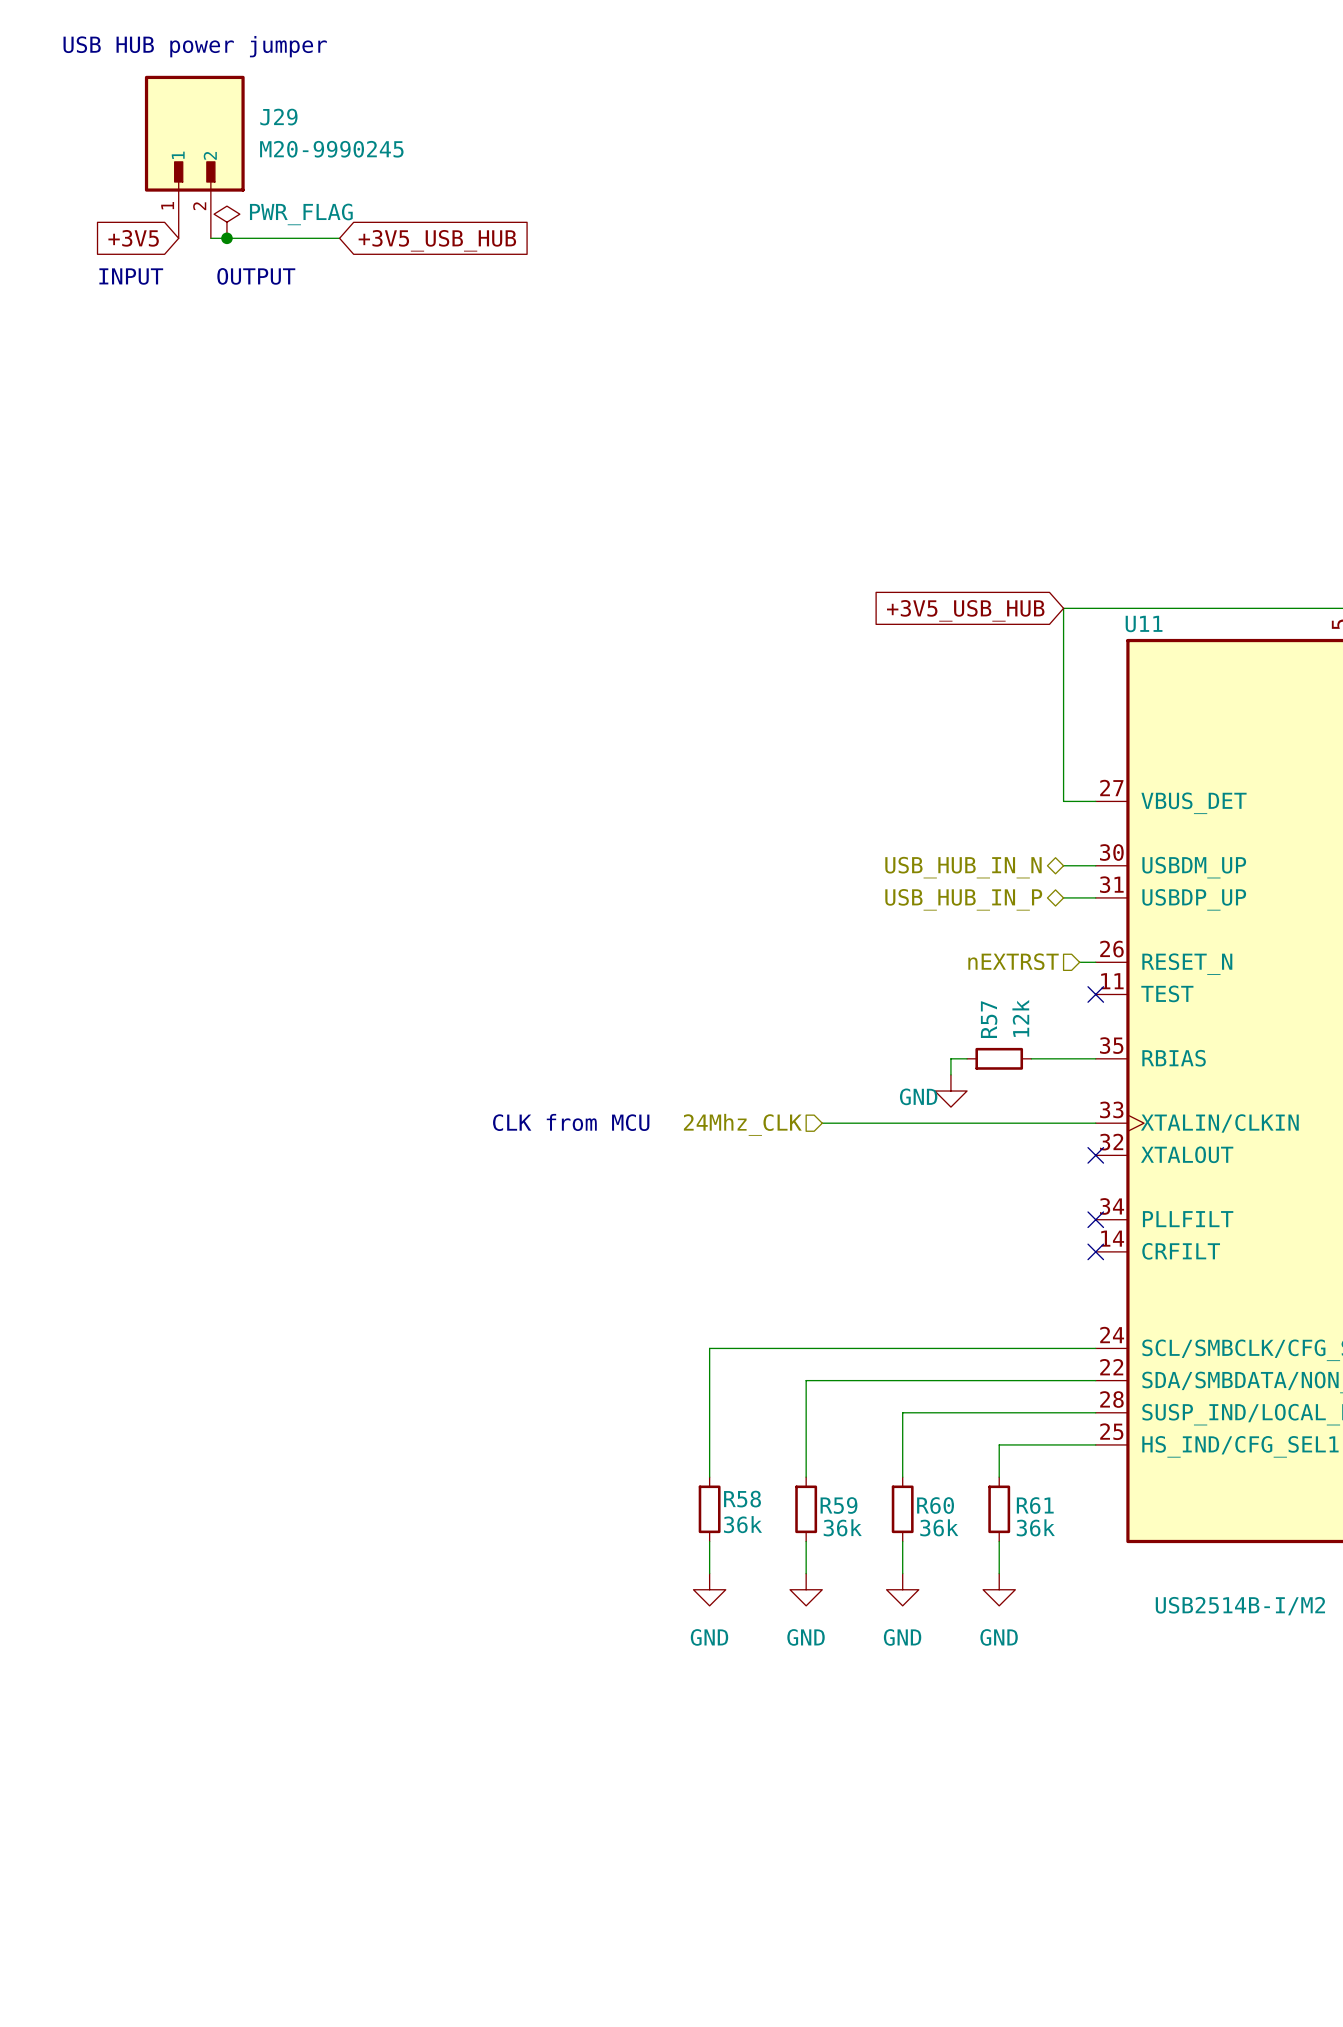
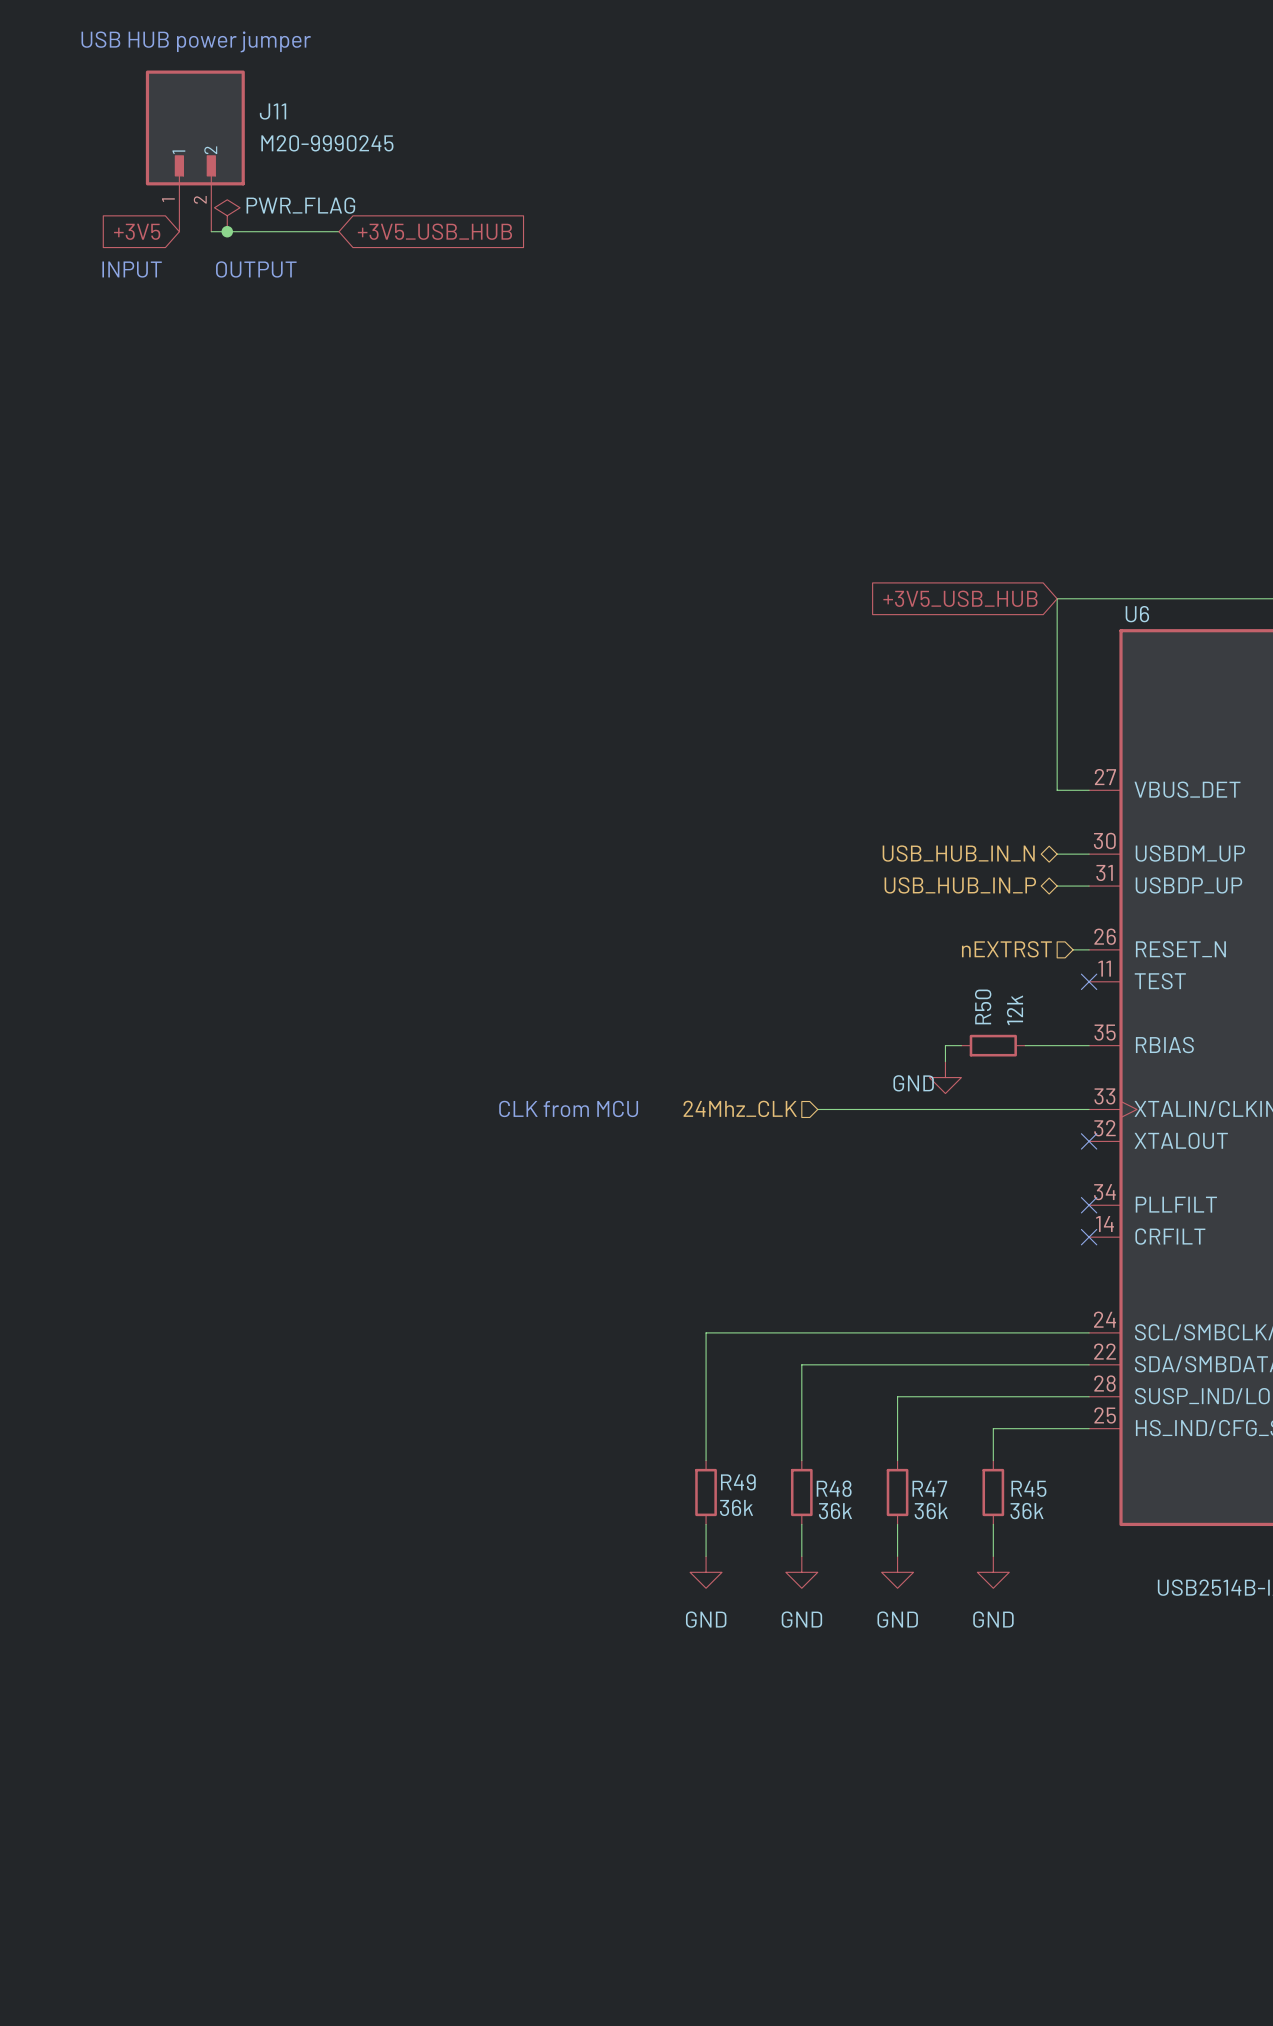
J29 name: J29 (278, 117) -> J11 (273, 111)
U11 name: U11 (1144, 623) -> U6 (1137, 614)
R57 name: R57 (989, 1019) -> R50 (983, 1006)
R58 name: R58 (742, 1499) -> R49 (738, 1482)
R59 name: R59 (838, 1505) -> R48 (834, 1488)
R60 name: R60 (935, 1505) -> R47 (929, 1488)
R61 name: R61 (1035, 1505) -> R45 (1028, 1488)

